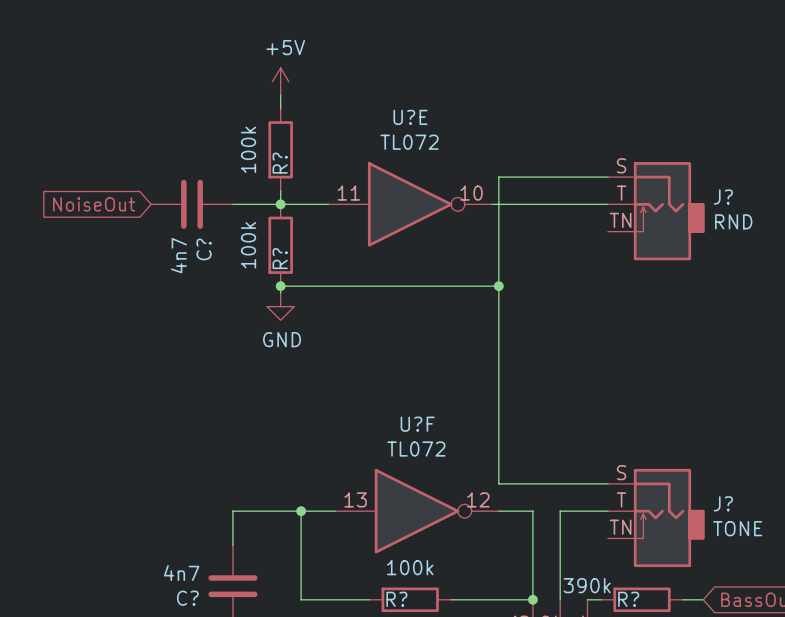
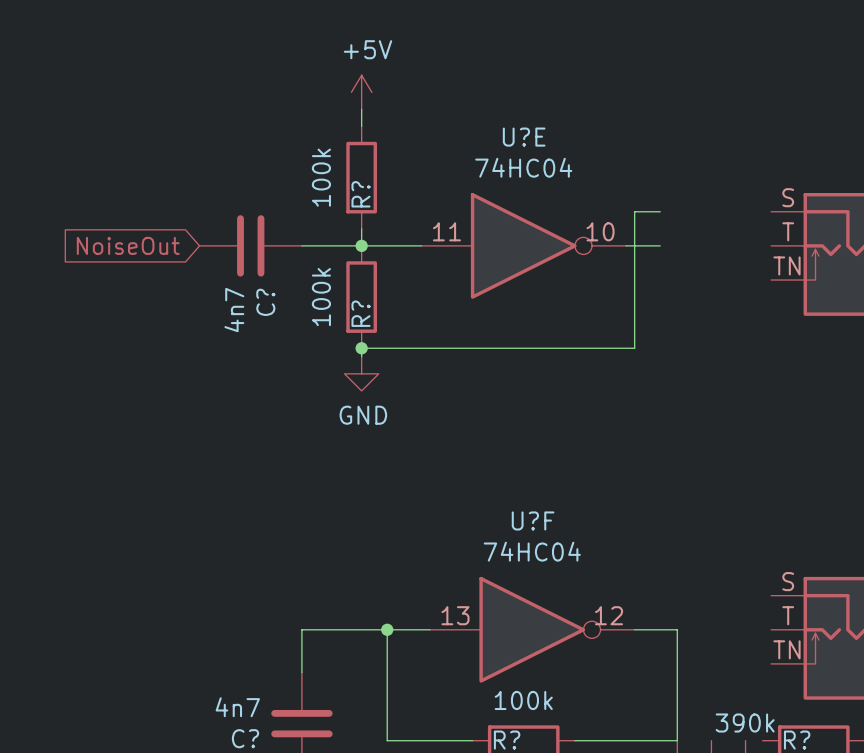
U?E value: TL072 (409, 142) -> 74HC04 (523, 167)
wire: (519, 177) (607, 177) -> none
wire: (519, 204) (607, 204) -> none
wire: (498, 286) (498, 483) (607, 483) -> none
junction: (498, 286) -> none
U?F value: TL072 (416, 449) -> 74HC04 (532, 551)
wire: (607, 511) (560, 511) (560, 599) -> none
junction: (532, 599) -> none
wire: (587, 599) (601, 599) -> none

